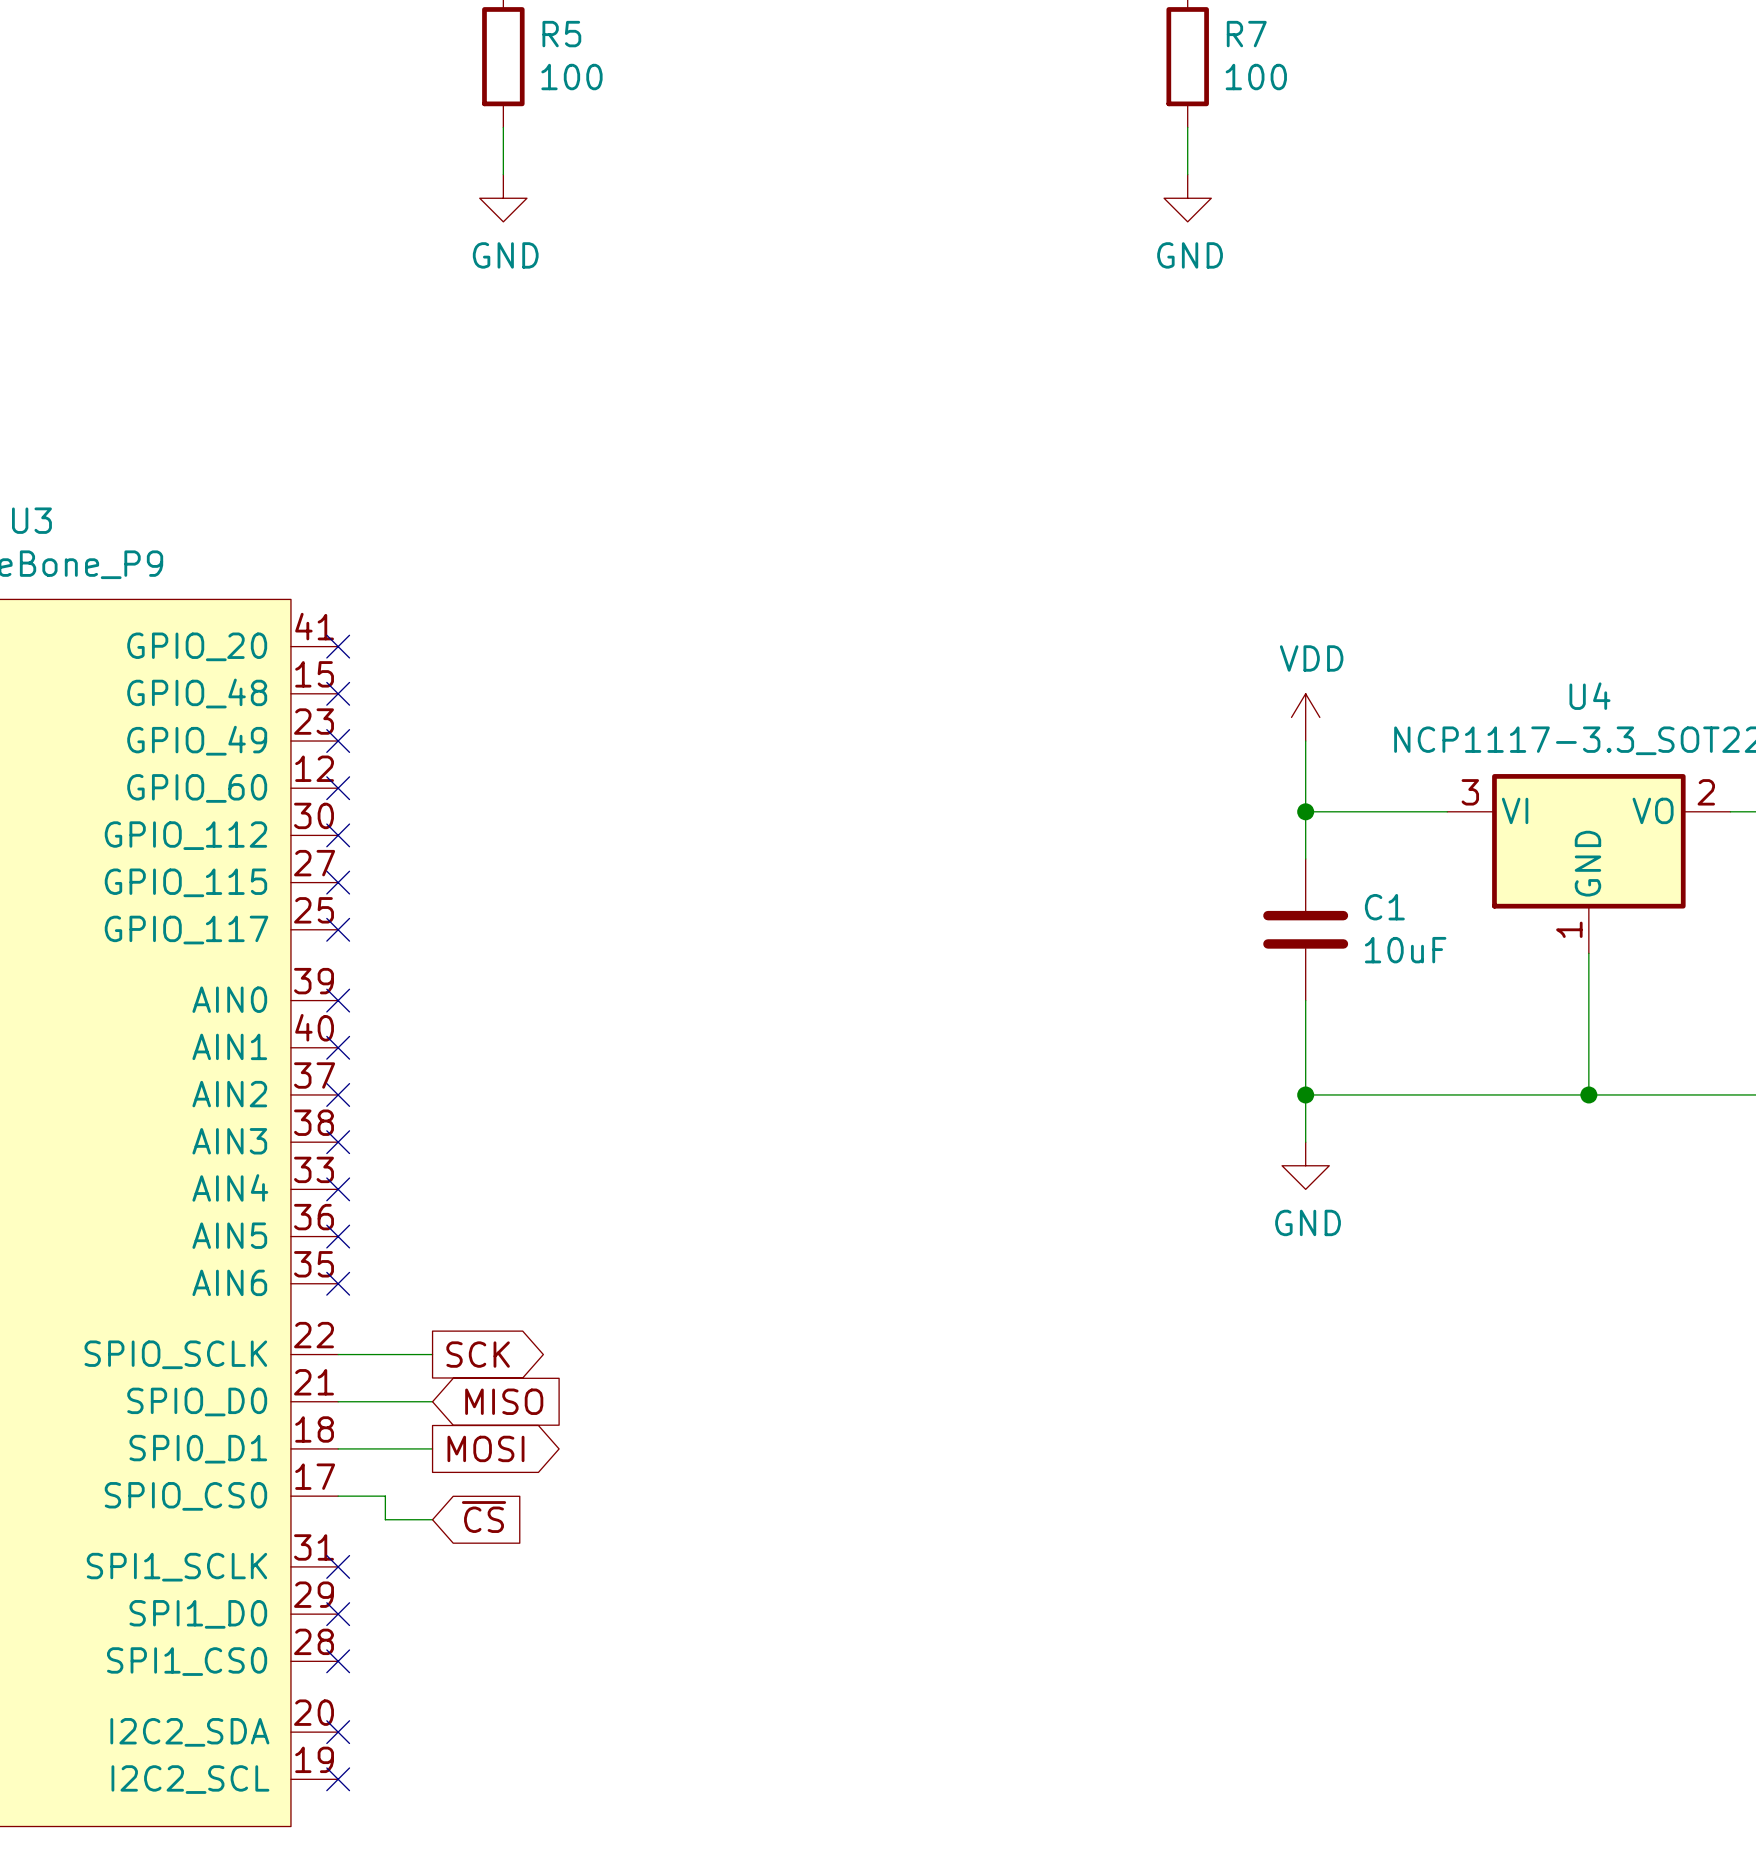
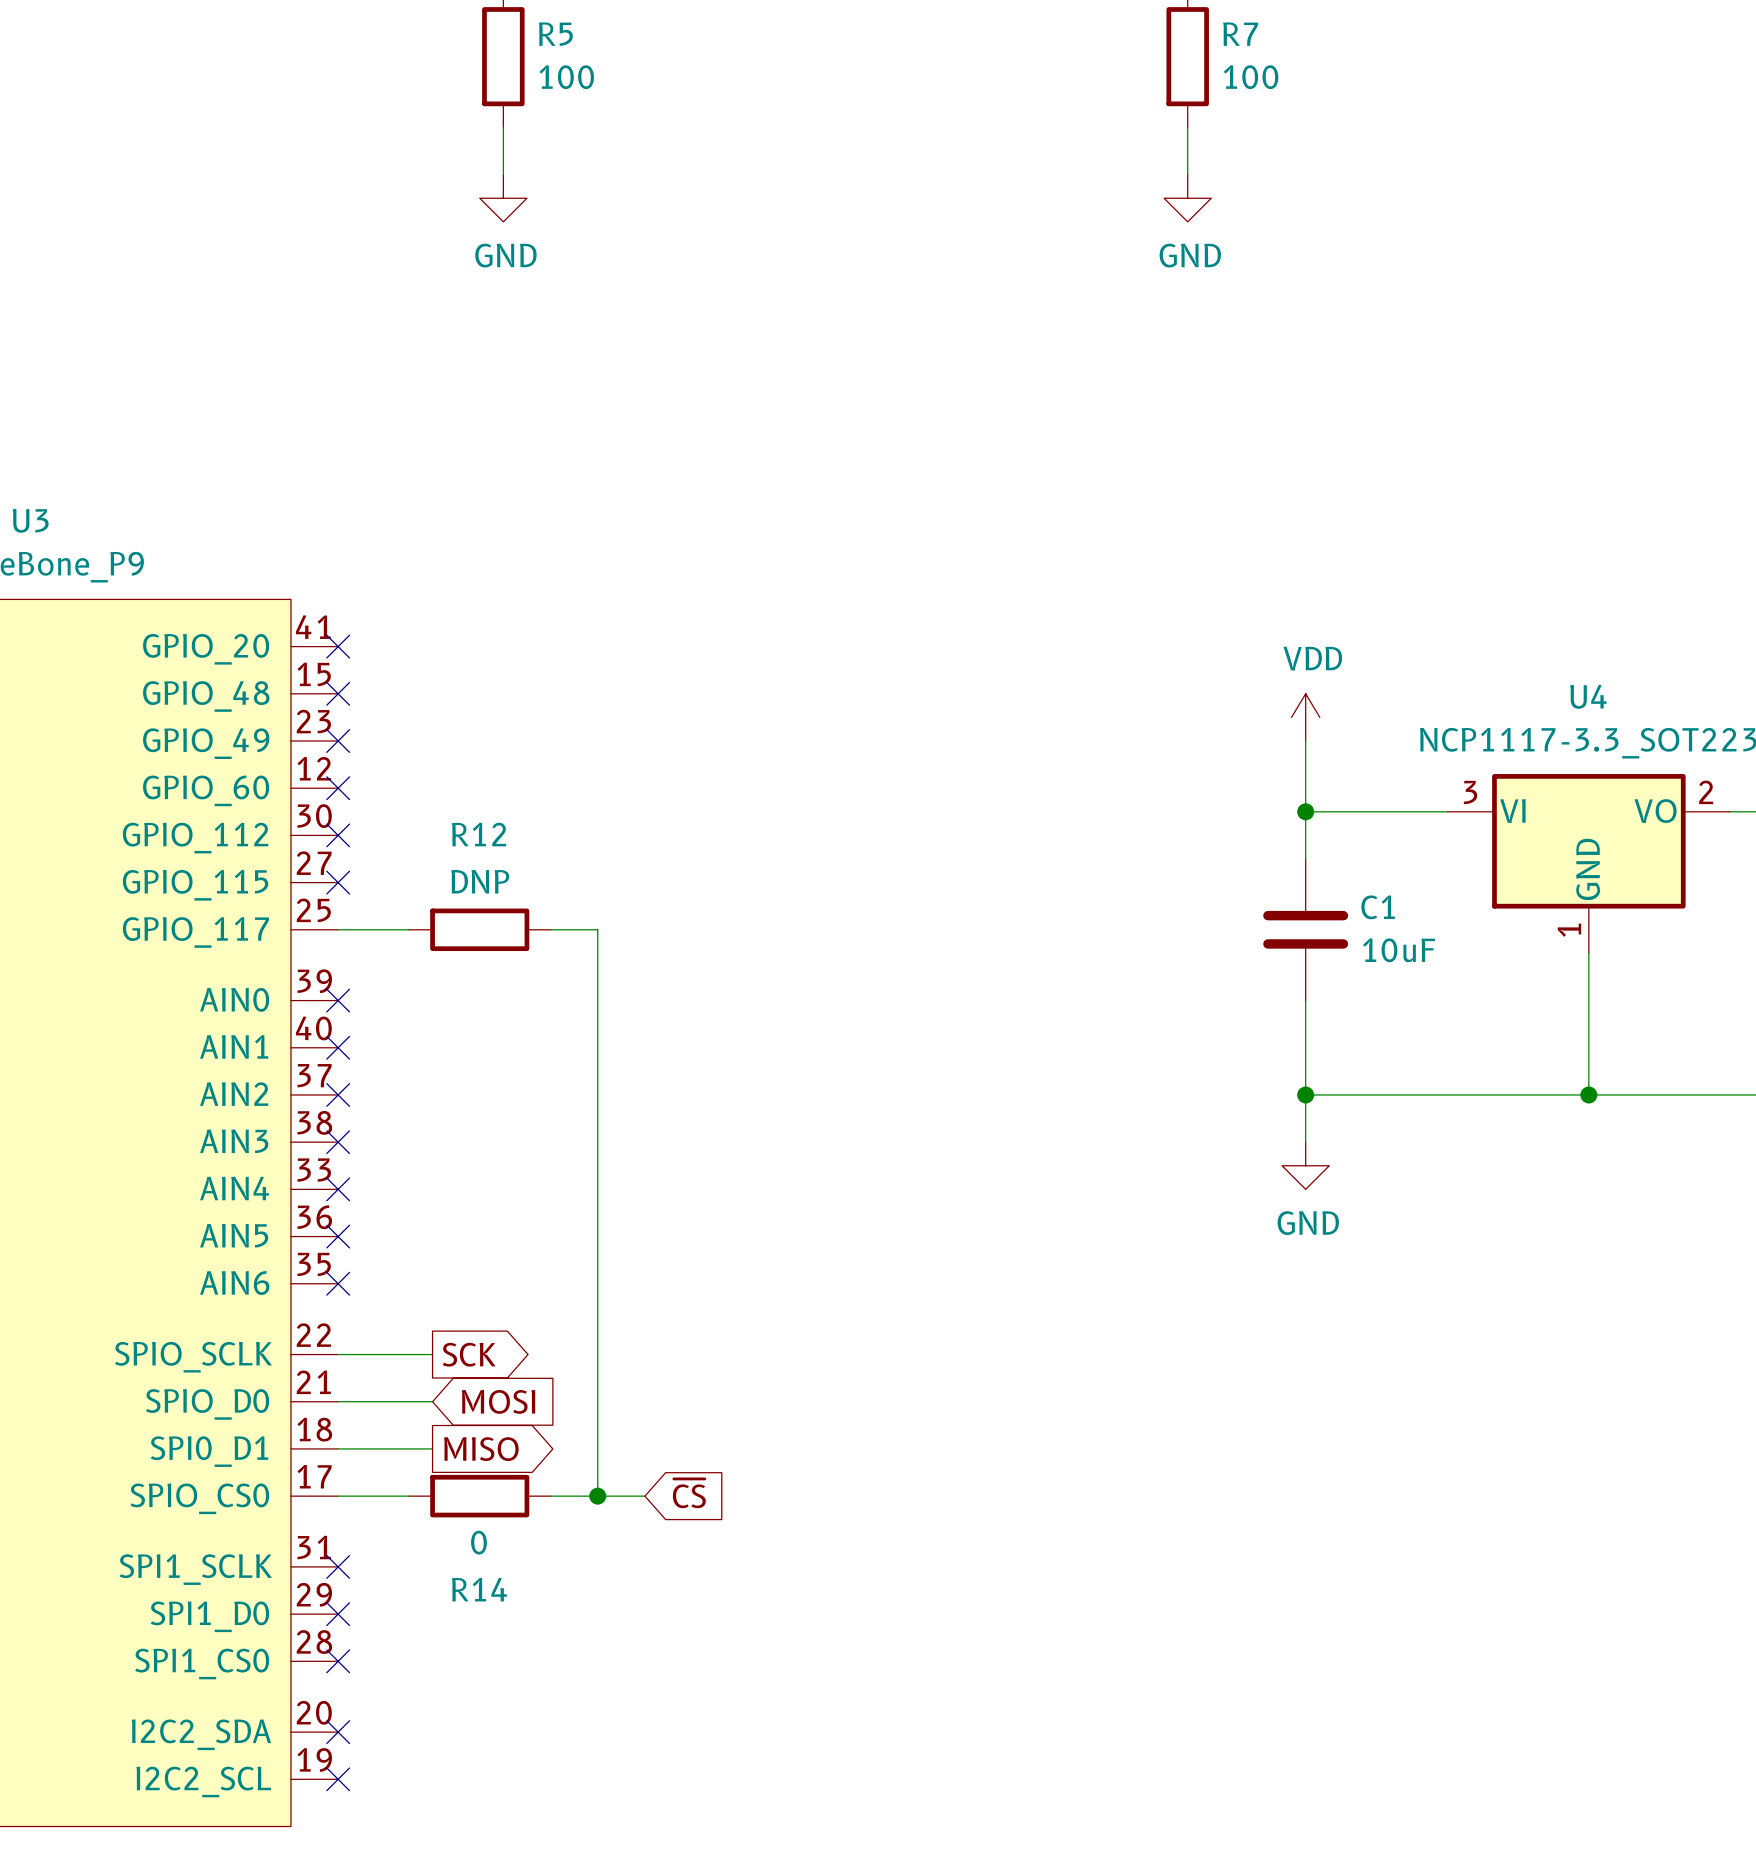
wire: none -> (338, 929) (408, 929)
no-connect mark: (338, 929) -> none
R12: none -> DNP (479, 929)
wire: none -> (550, 929) (597, 929) (597, 1496)
global label: MISO (504, 1401) -> MOSI (498, 1401)
global label: MOSI (485, 1448) -> MISO (481, 1449)
wire: (385, 1496) (385, 1519) (432, 1519) -> (385, 1496) (408, 1496)
R14: none -> 0 (479, 1496)
wire: none -> (550, 1496) (644, 1496)
junction: none -> (597, 1496)
global label position: ~{CS} (484, 1517) -> ~{CS} (689, 1493)

